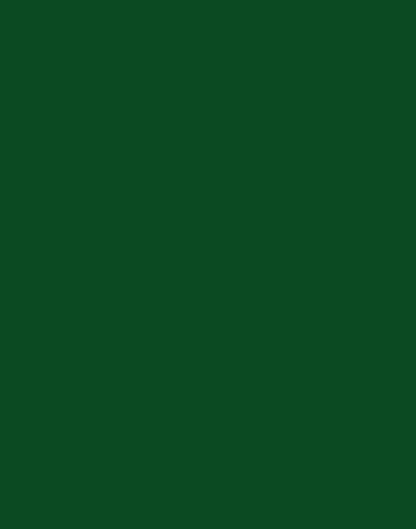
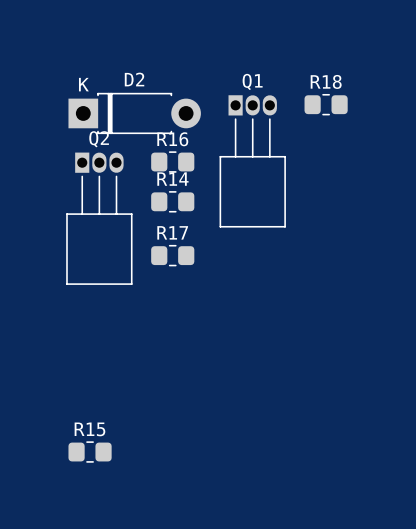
R18: none -> (326, 104)
D2: none -> (134, 113)
Q1: none -> (252, 161)
R16: none -> (172, 162)
R14: none -> (172, 201)
Q2: none -> (99, 218)
R17: none -> (172, 255)
R15: none -> (90, 452)

